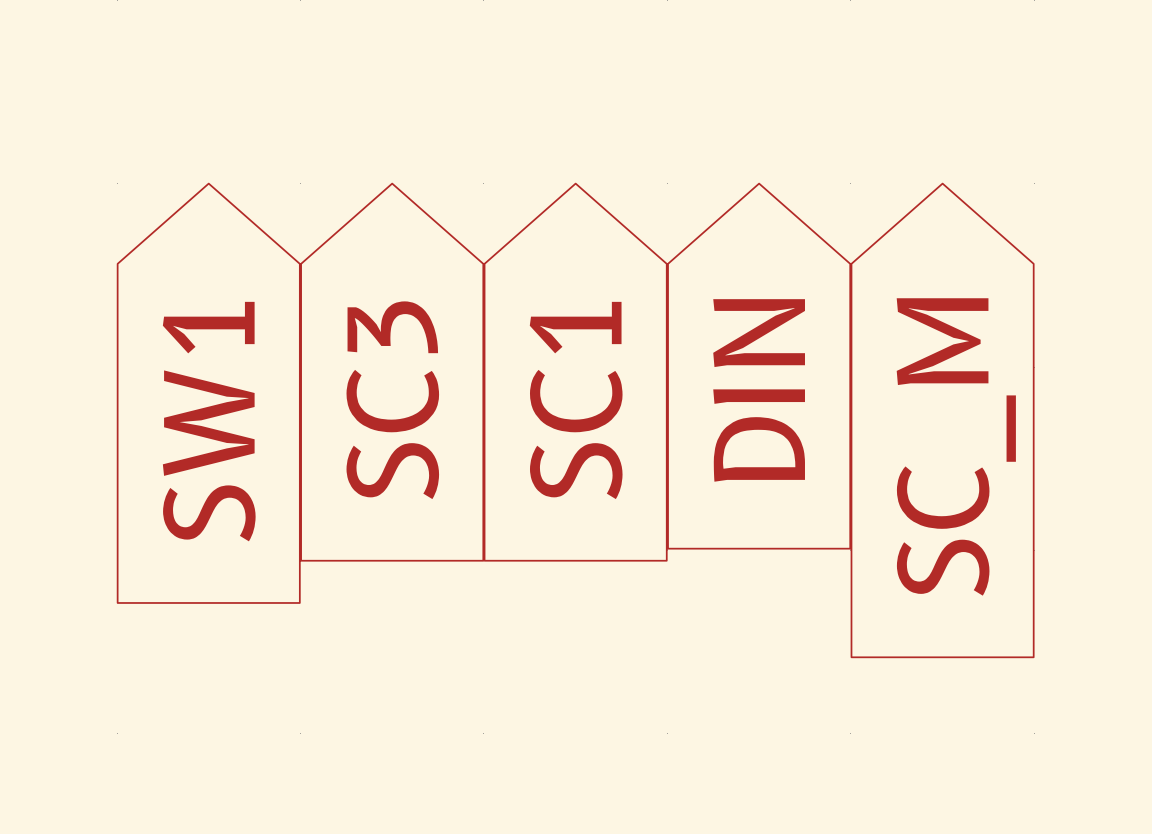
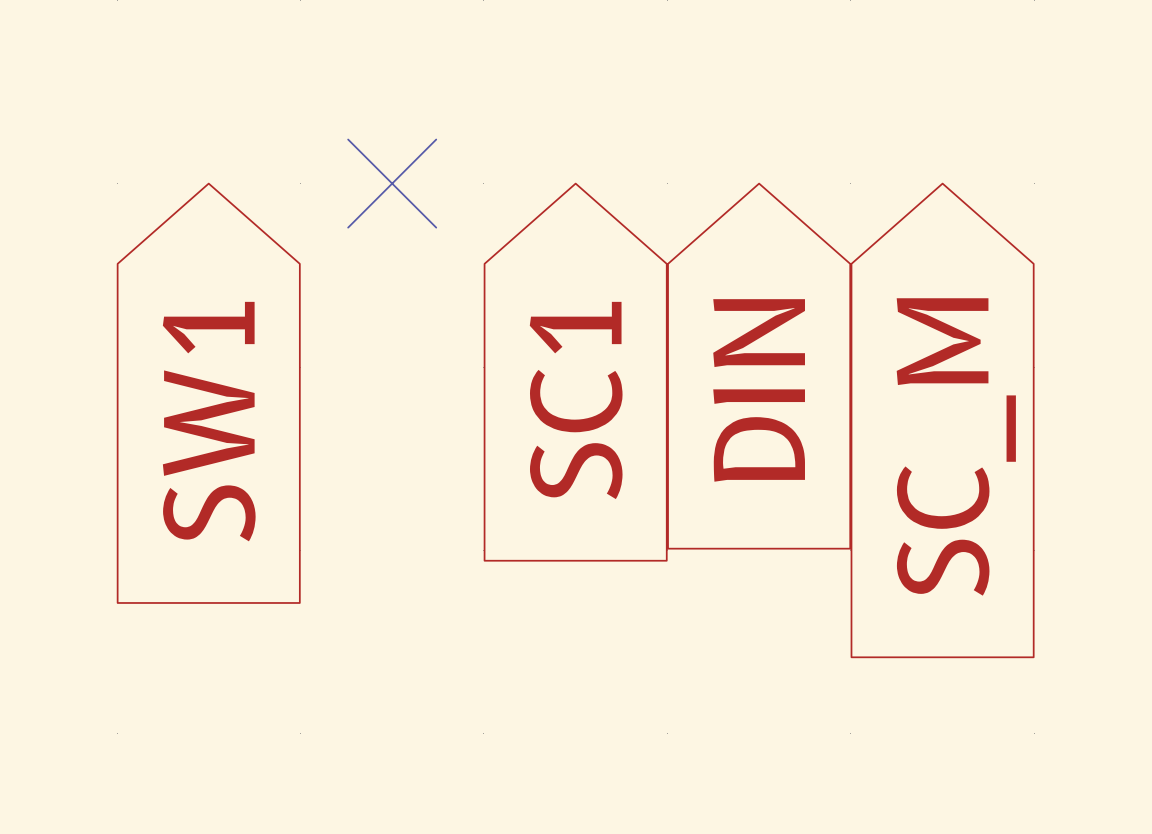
no-connect mark: none -> (392, 183)
global label: SC3 (392, 400) -> none

